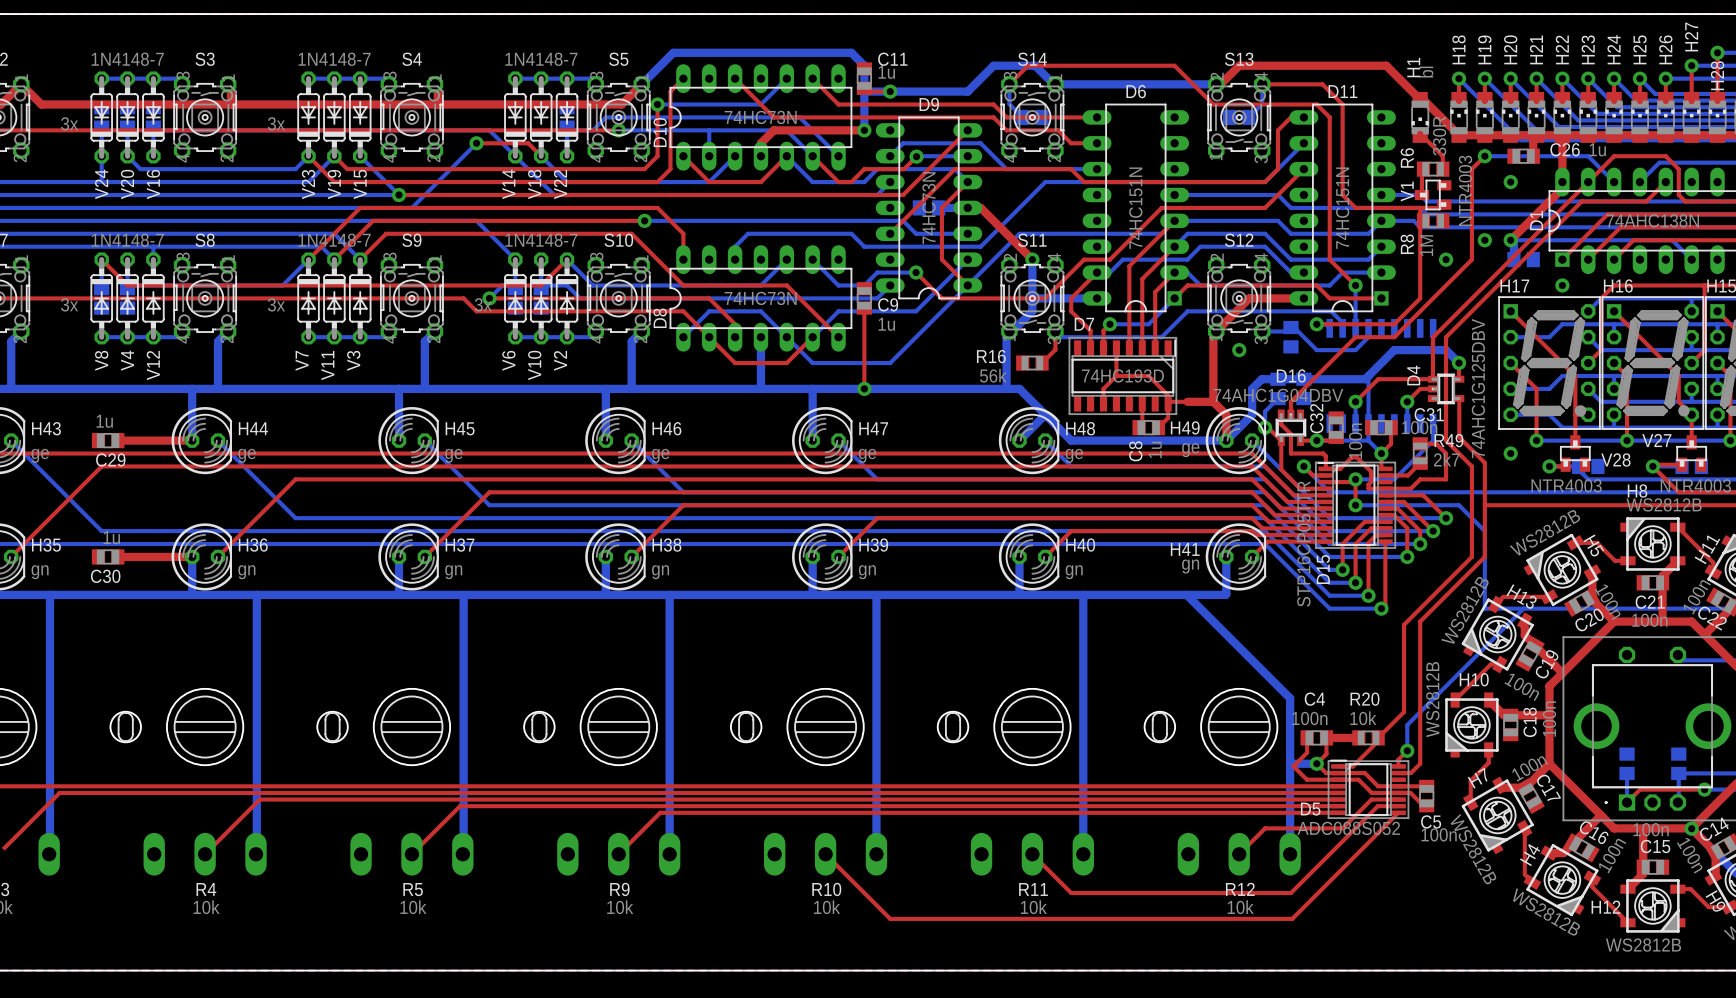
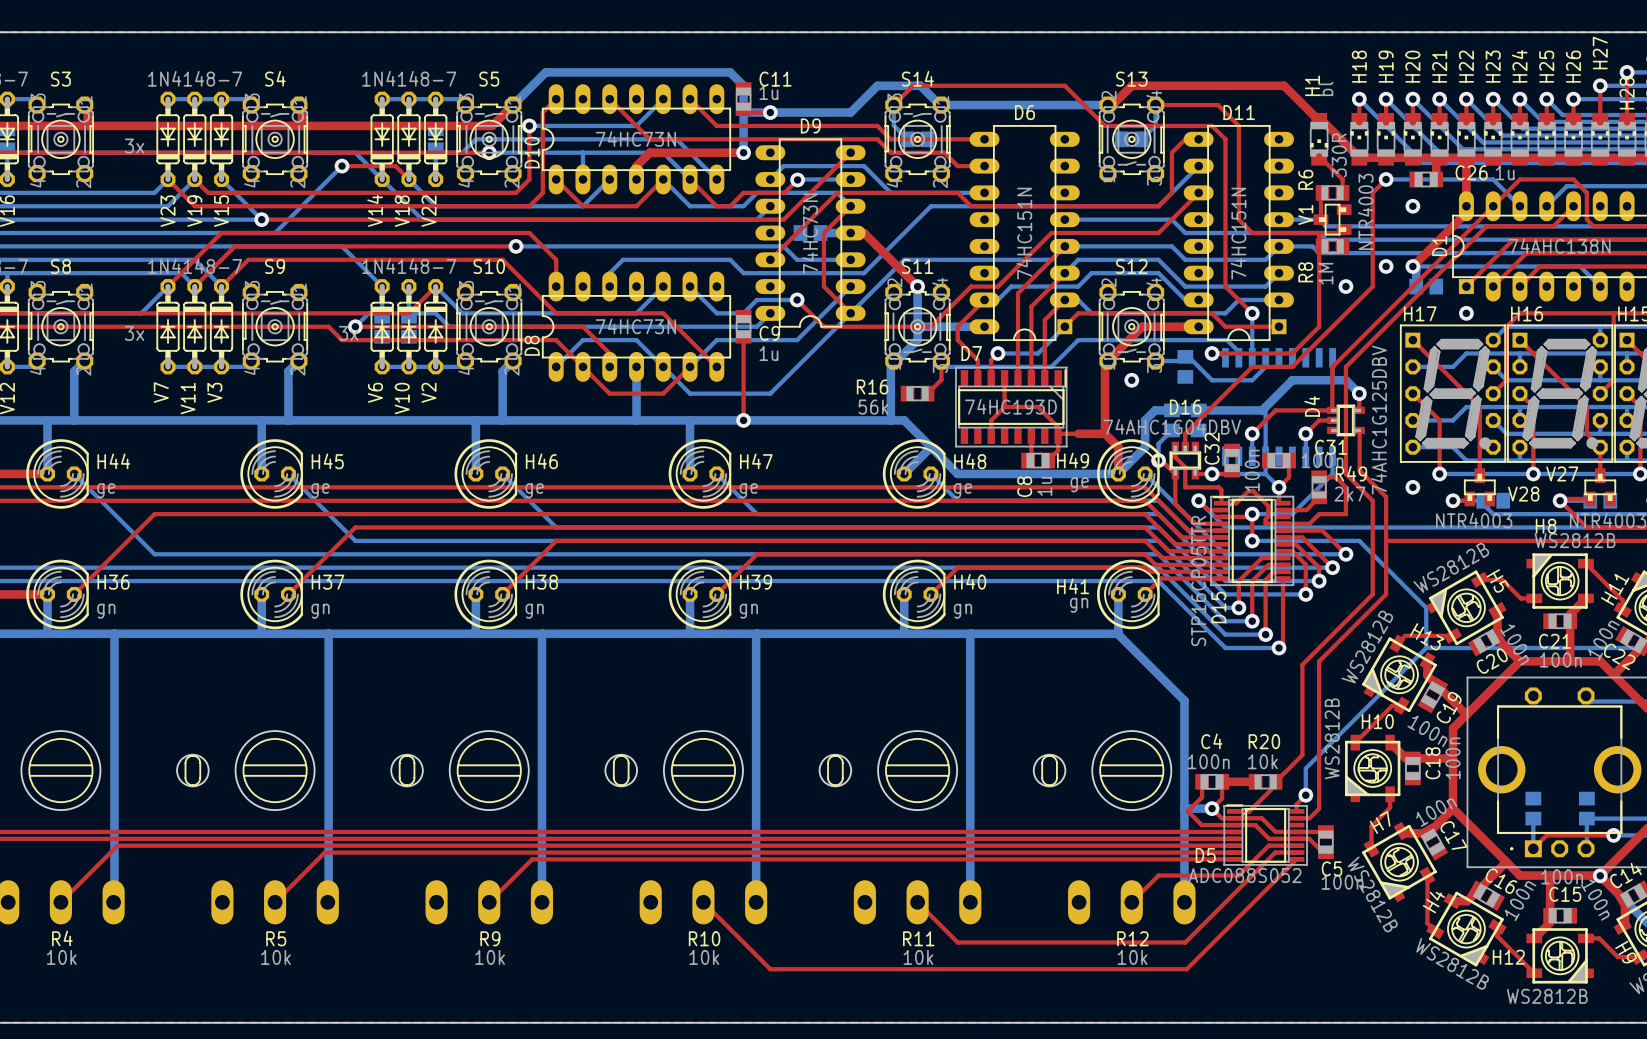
bottom track: (1484, 531) (1484, 608) (1523, 608) -> (1386, 567) (1426, 607) (1426, 647)
bottom track: (1186, 594) (1290, 698) -> (1117, 633) (1184, 700) (1184, 740)

